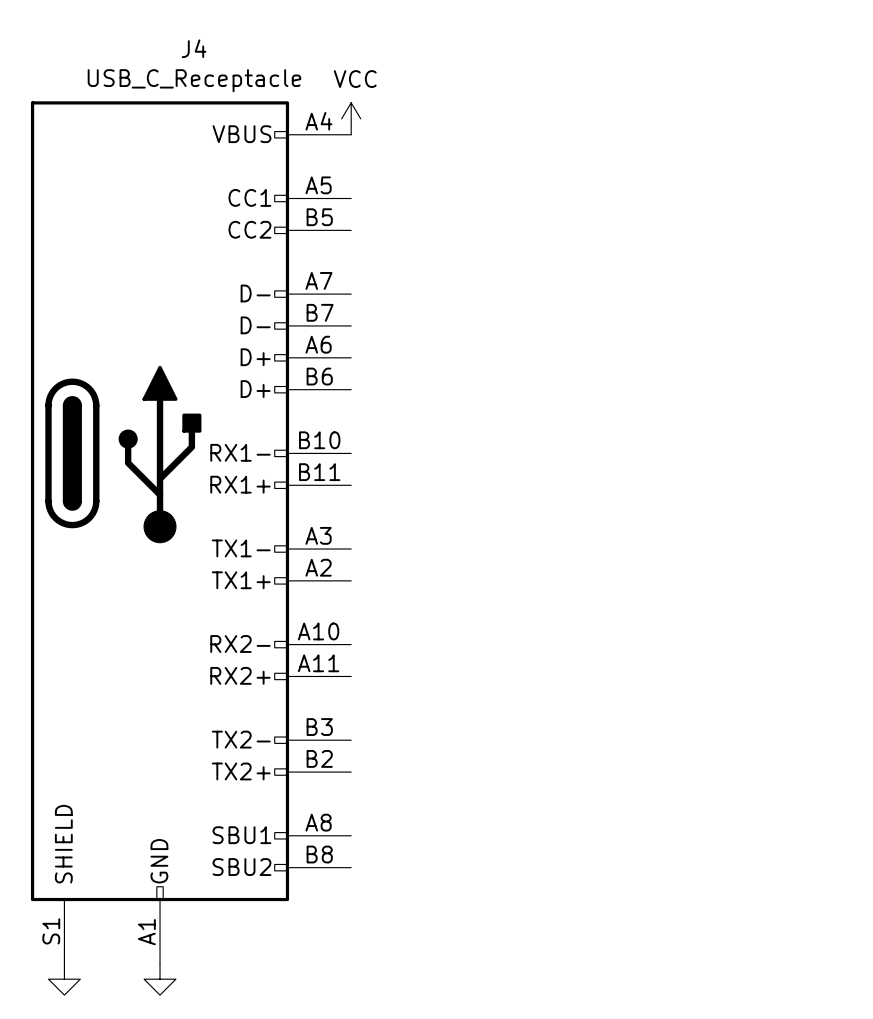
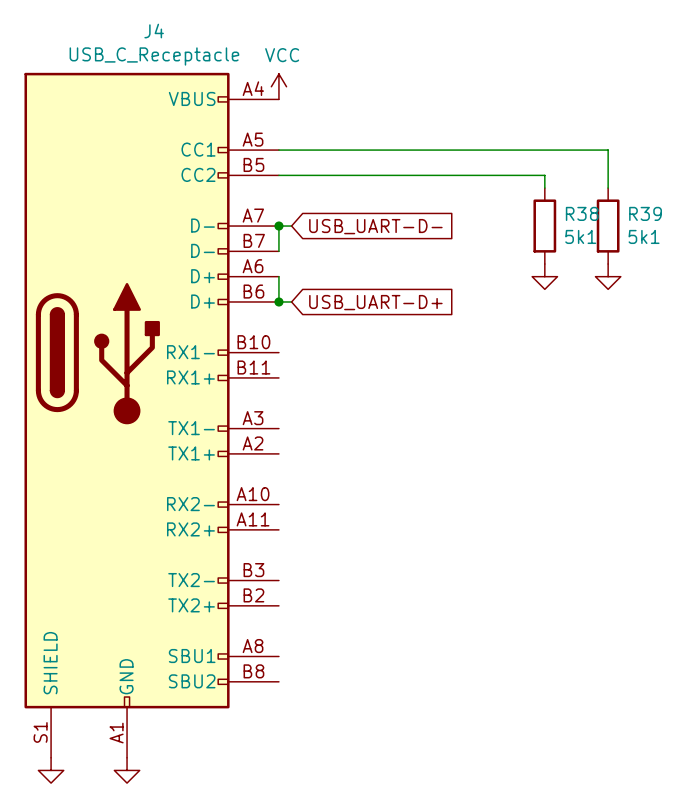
wire: none -> (278, 150) (608, 150) (608, 188)
wire: none -> (278, 175) (544, 175) (544, 188)
junction: none -> (278, 226)
wire: none -> (291, 226) (278, 226) (278, 251)
global label: none -> USB_UART-D- (375, 226)
R38: none -> 5k1 (544, 226)
R39: none -> 5k1 (608, 226)
wire: none -> (278, 276) (278, 301) (291, 301)
power symbol: none -> (544, 276)
power symbol: none -> (608, 276)
junction: none -> (278, 301)
global label: none -> USB_UART-D+ (375, 302)

